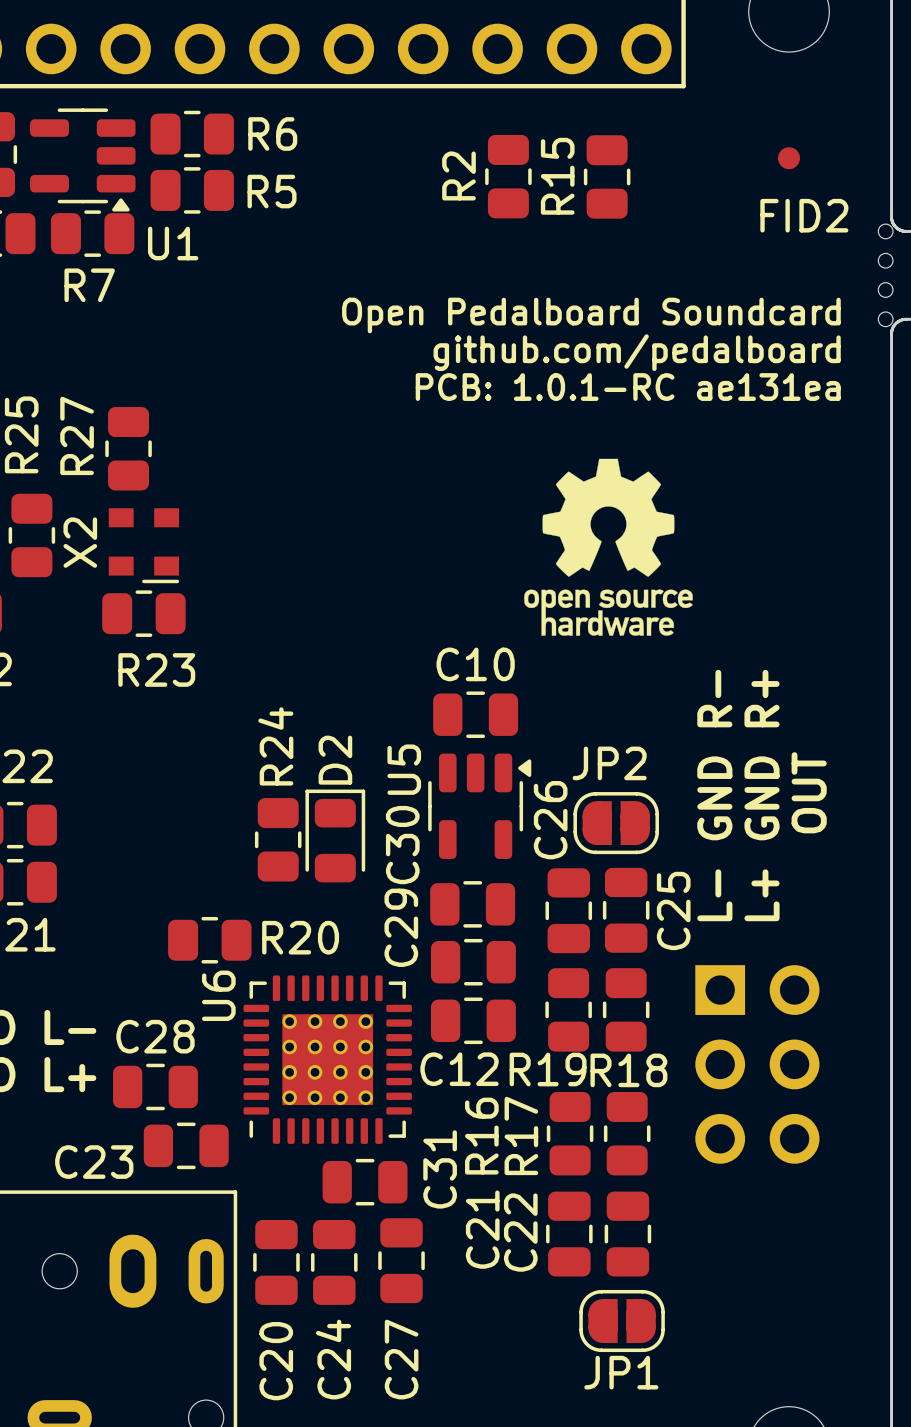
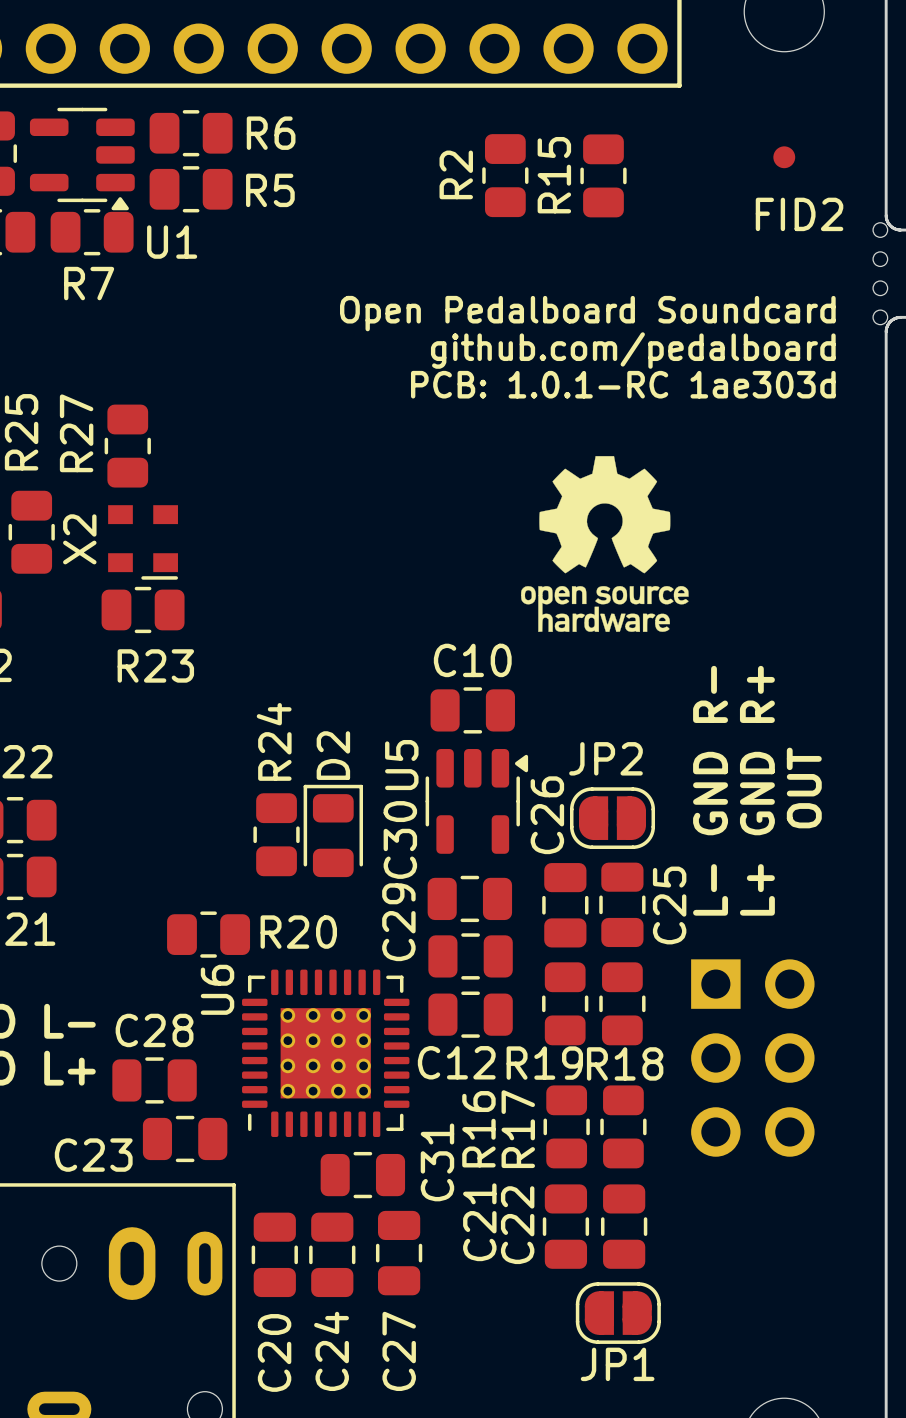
text: PCB: 1.0.1-RC ae131ea (628, 387) -> PCB: 1.0.1-RC 1ae303d (623, 384)

